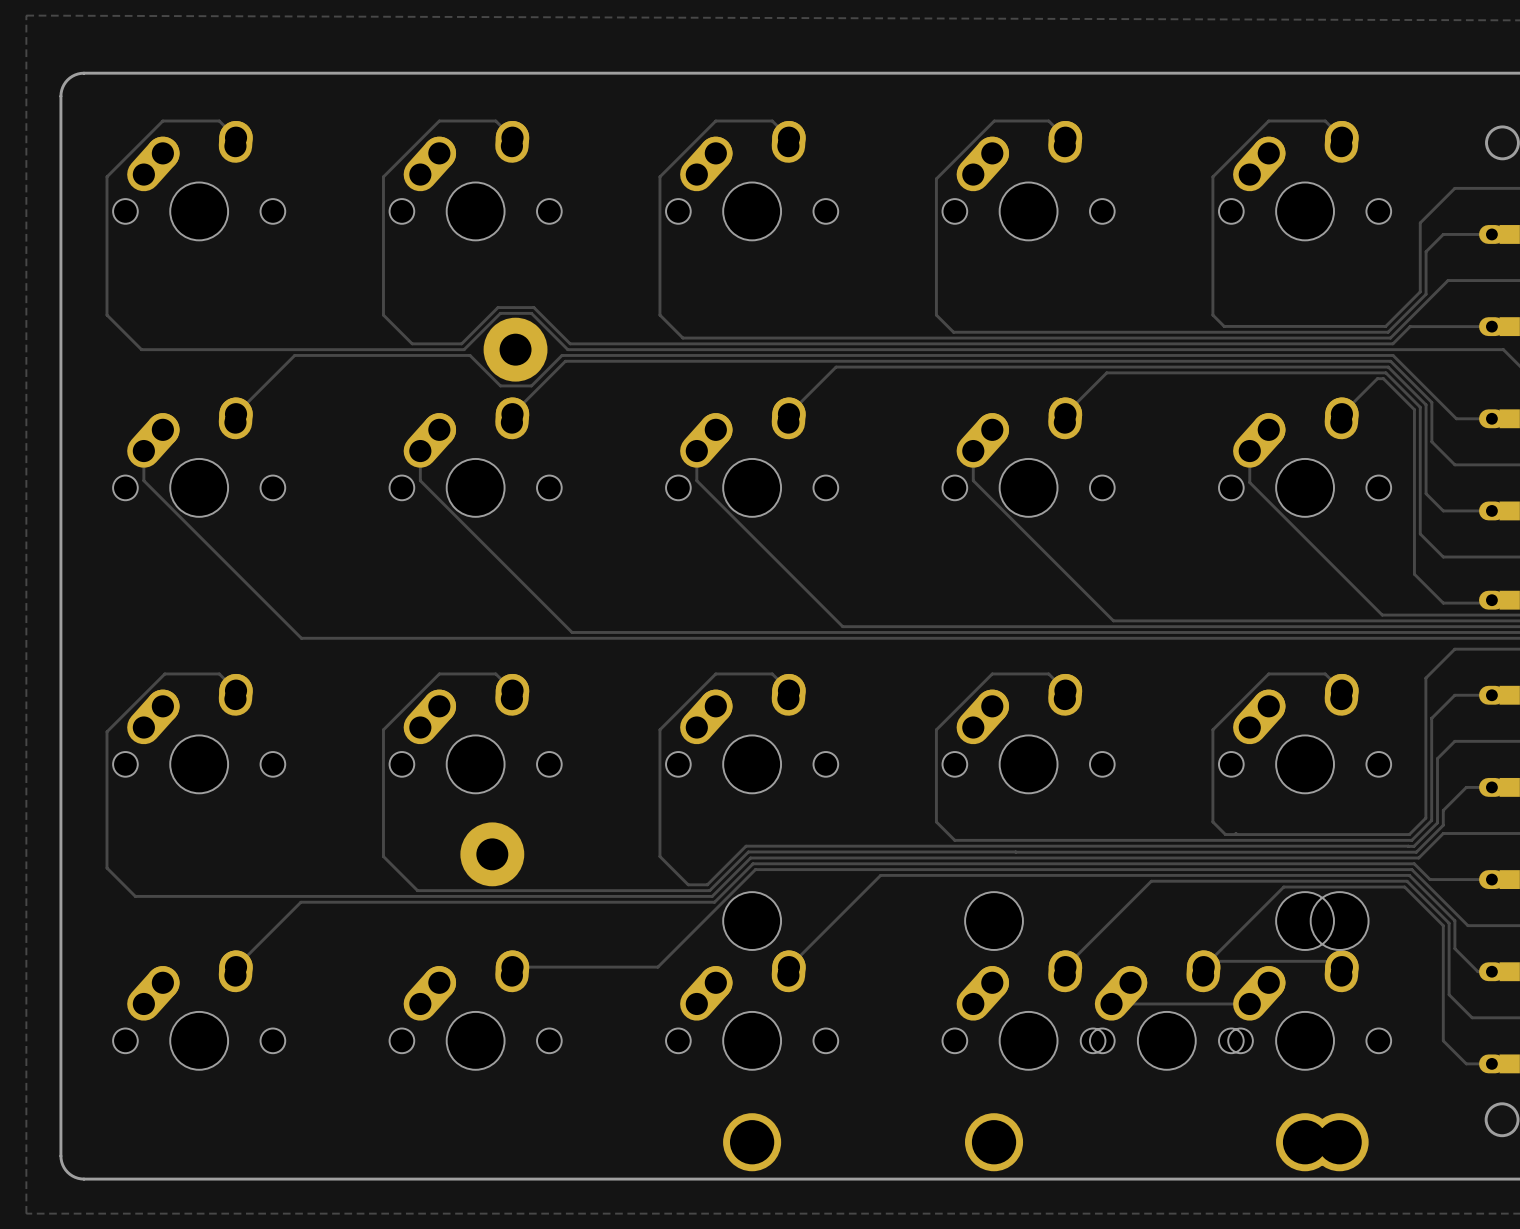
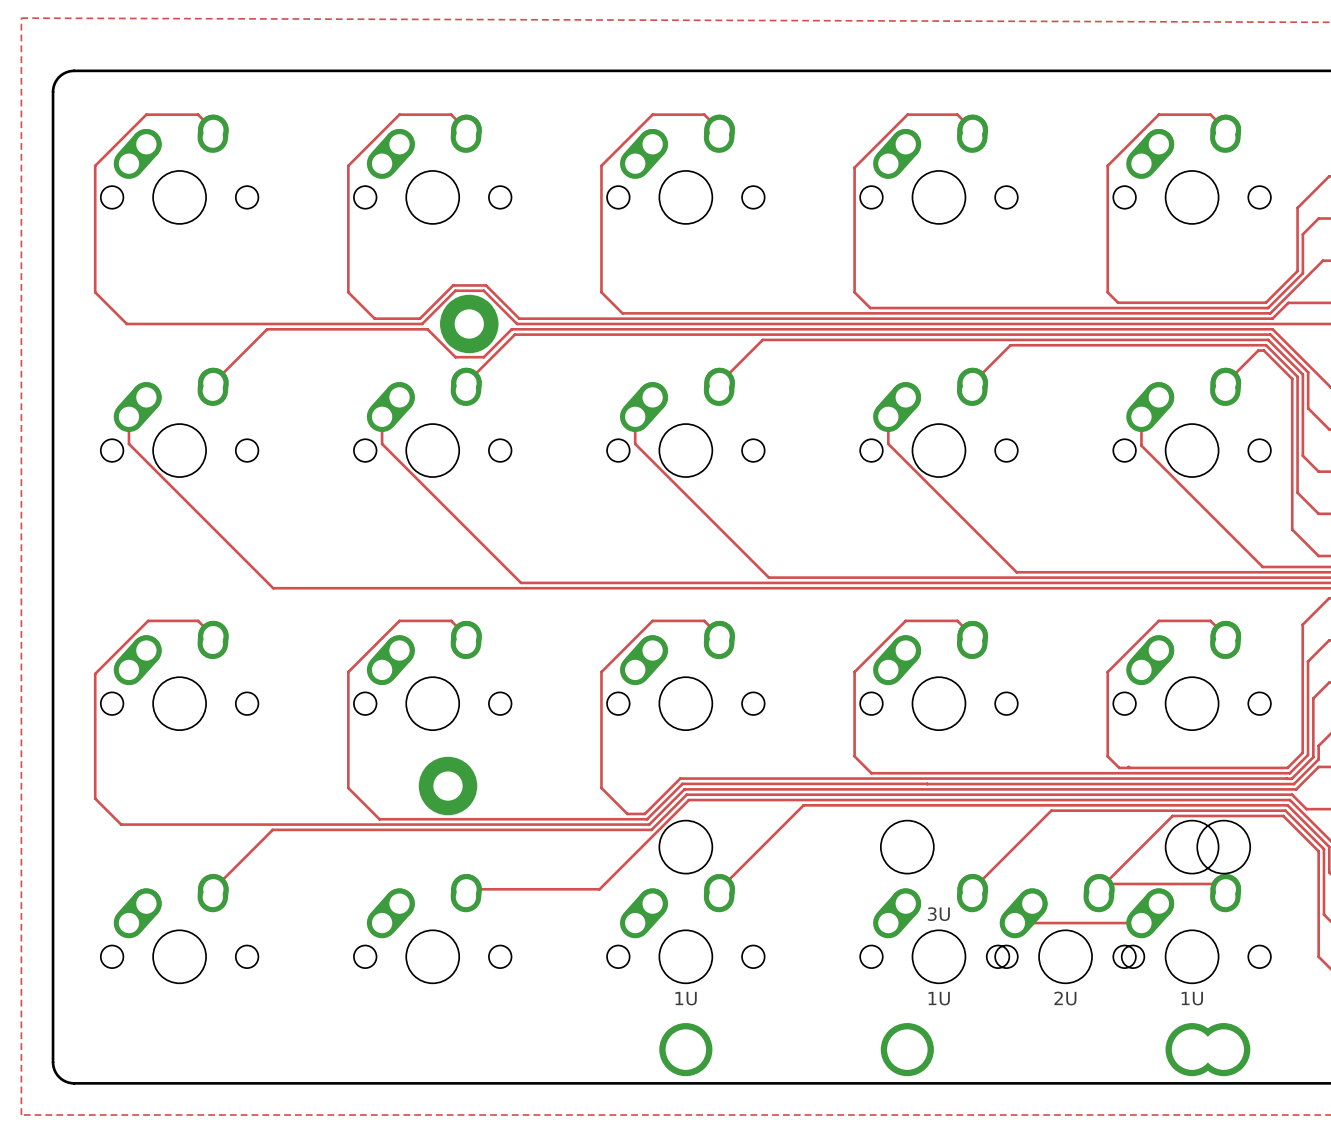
text: none -> 3U (938, 914)
text: none -> 1U (686, 998)
text: none -> 1U (939, 998)
text: none -> 2U (1065, 998)
text: none -> 1U (1192, 998)

